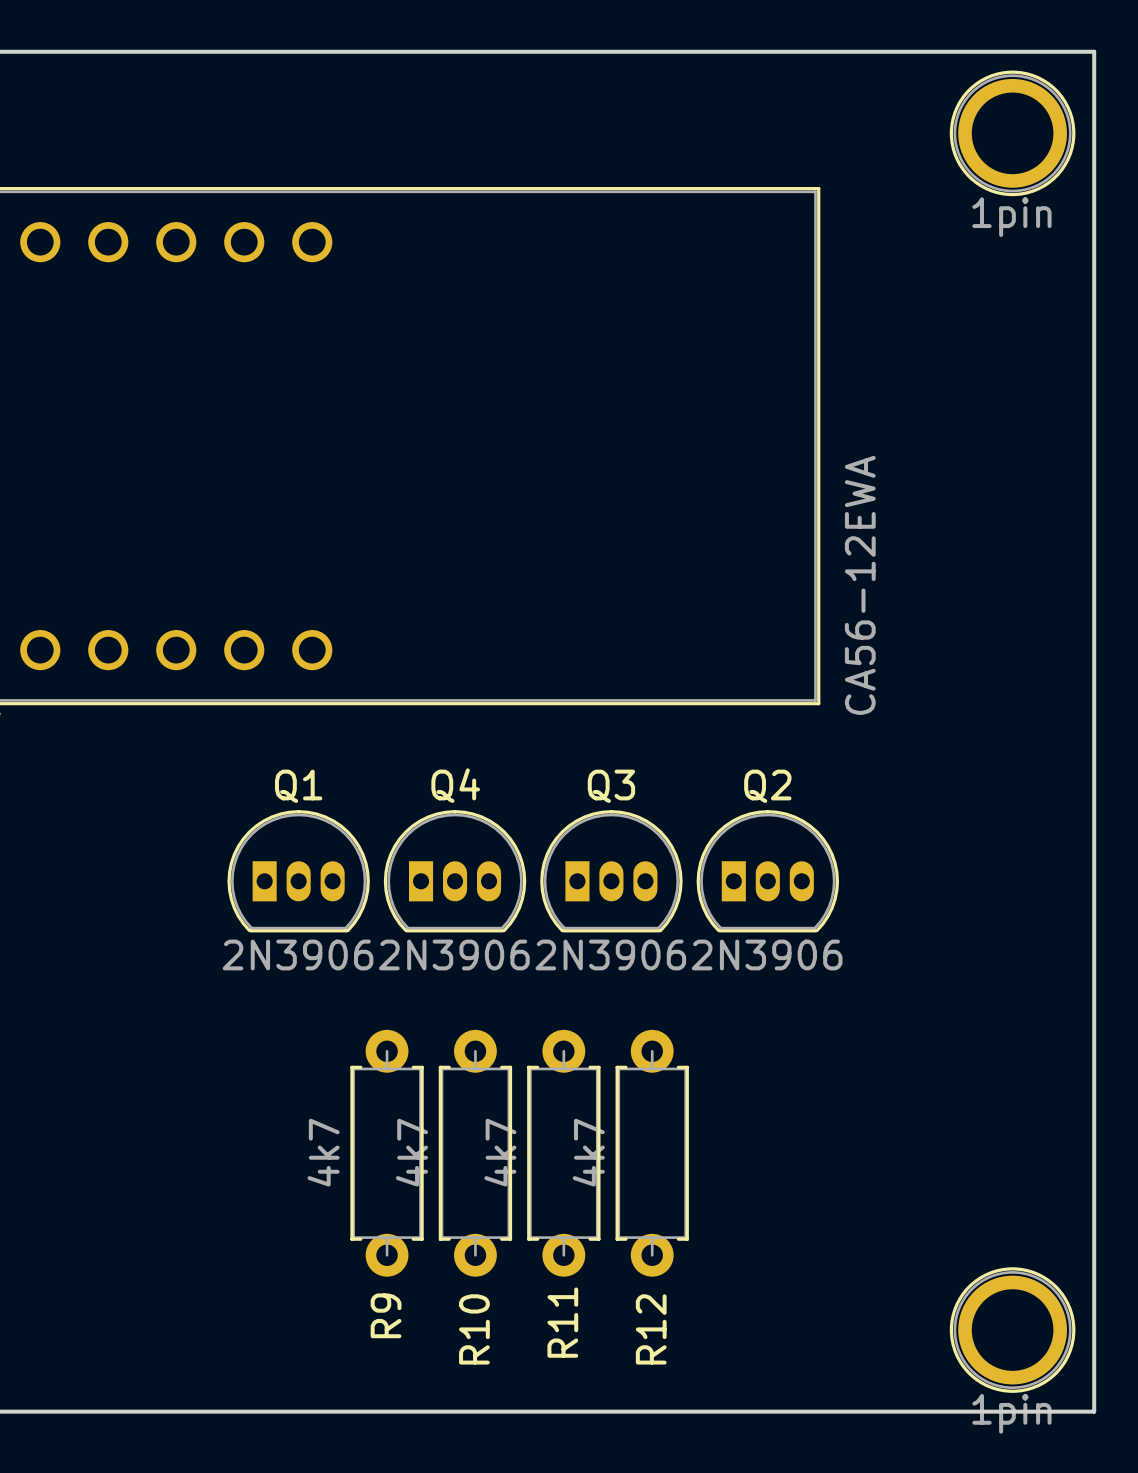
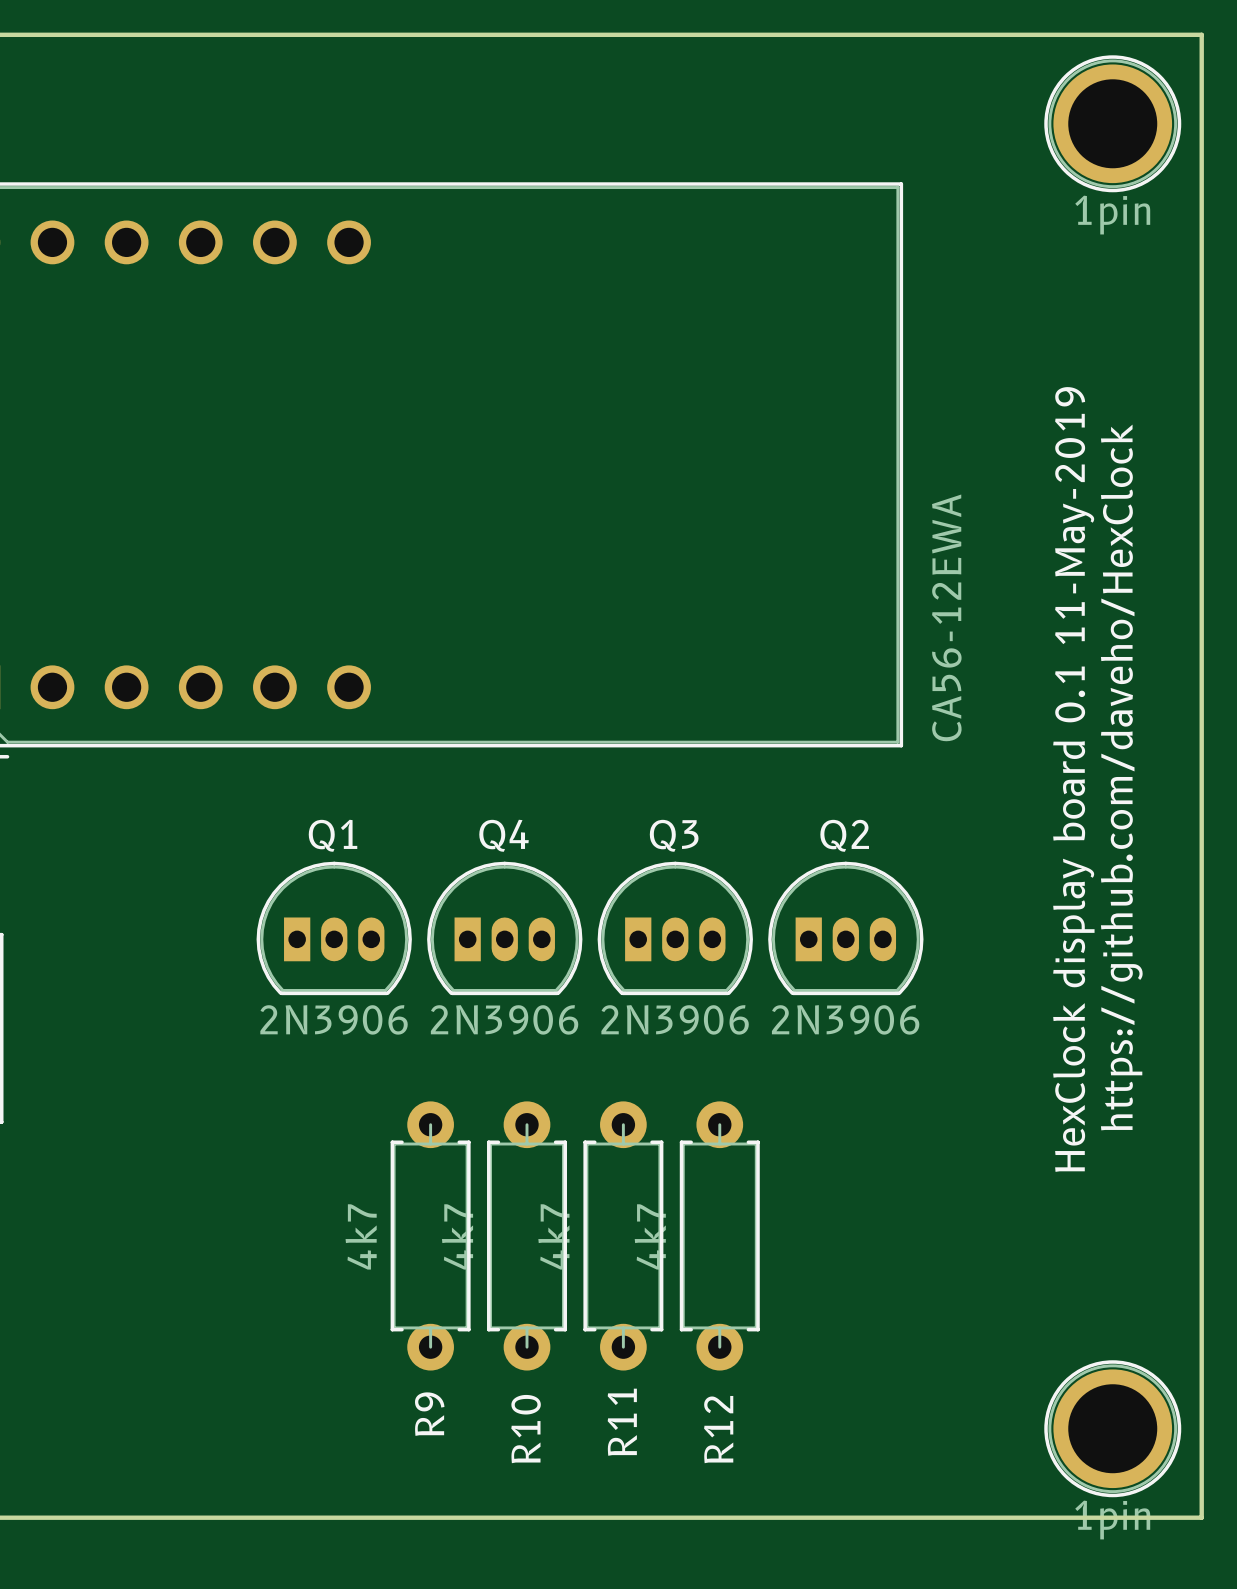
text: none -> HexClock display board 0.1 11-May-2019 (1073, 779)
text: none -> https://github.com/daveho/HexClock (1121, 777)

